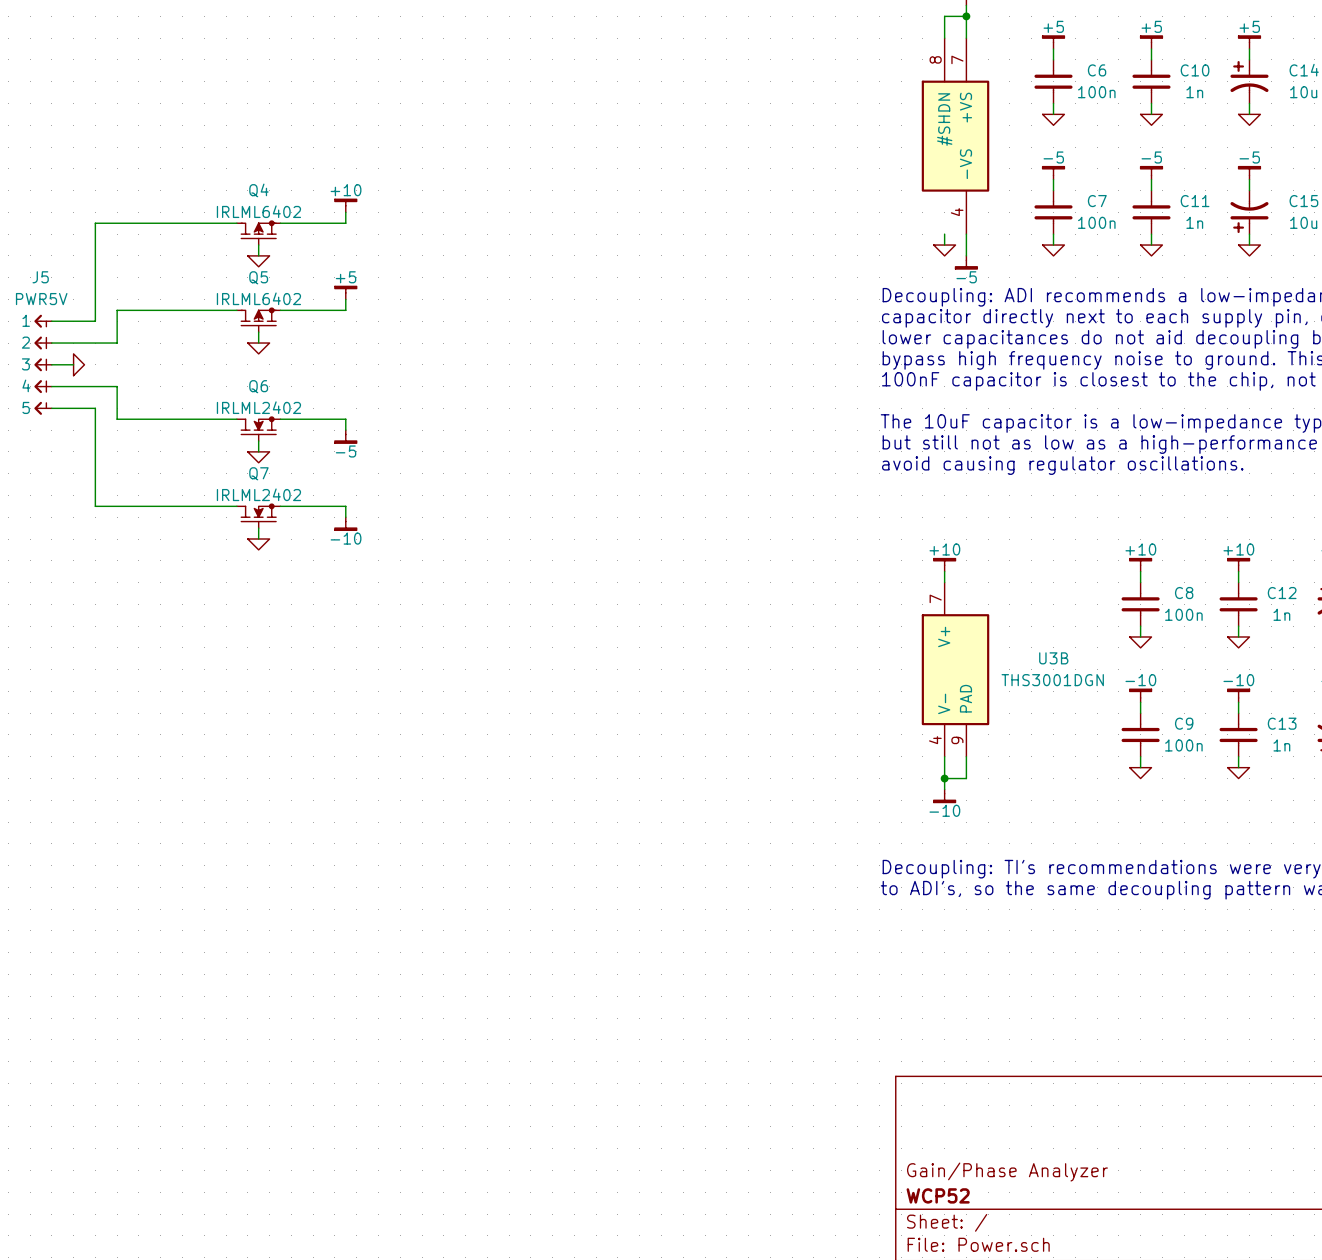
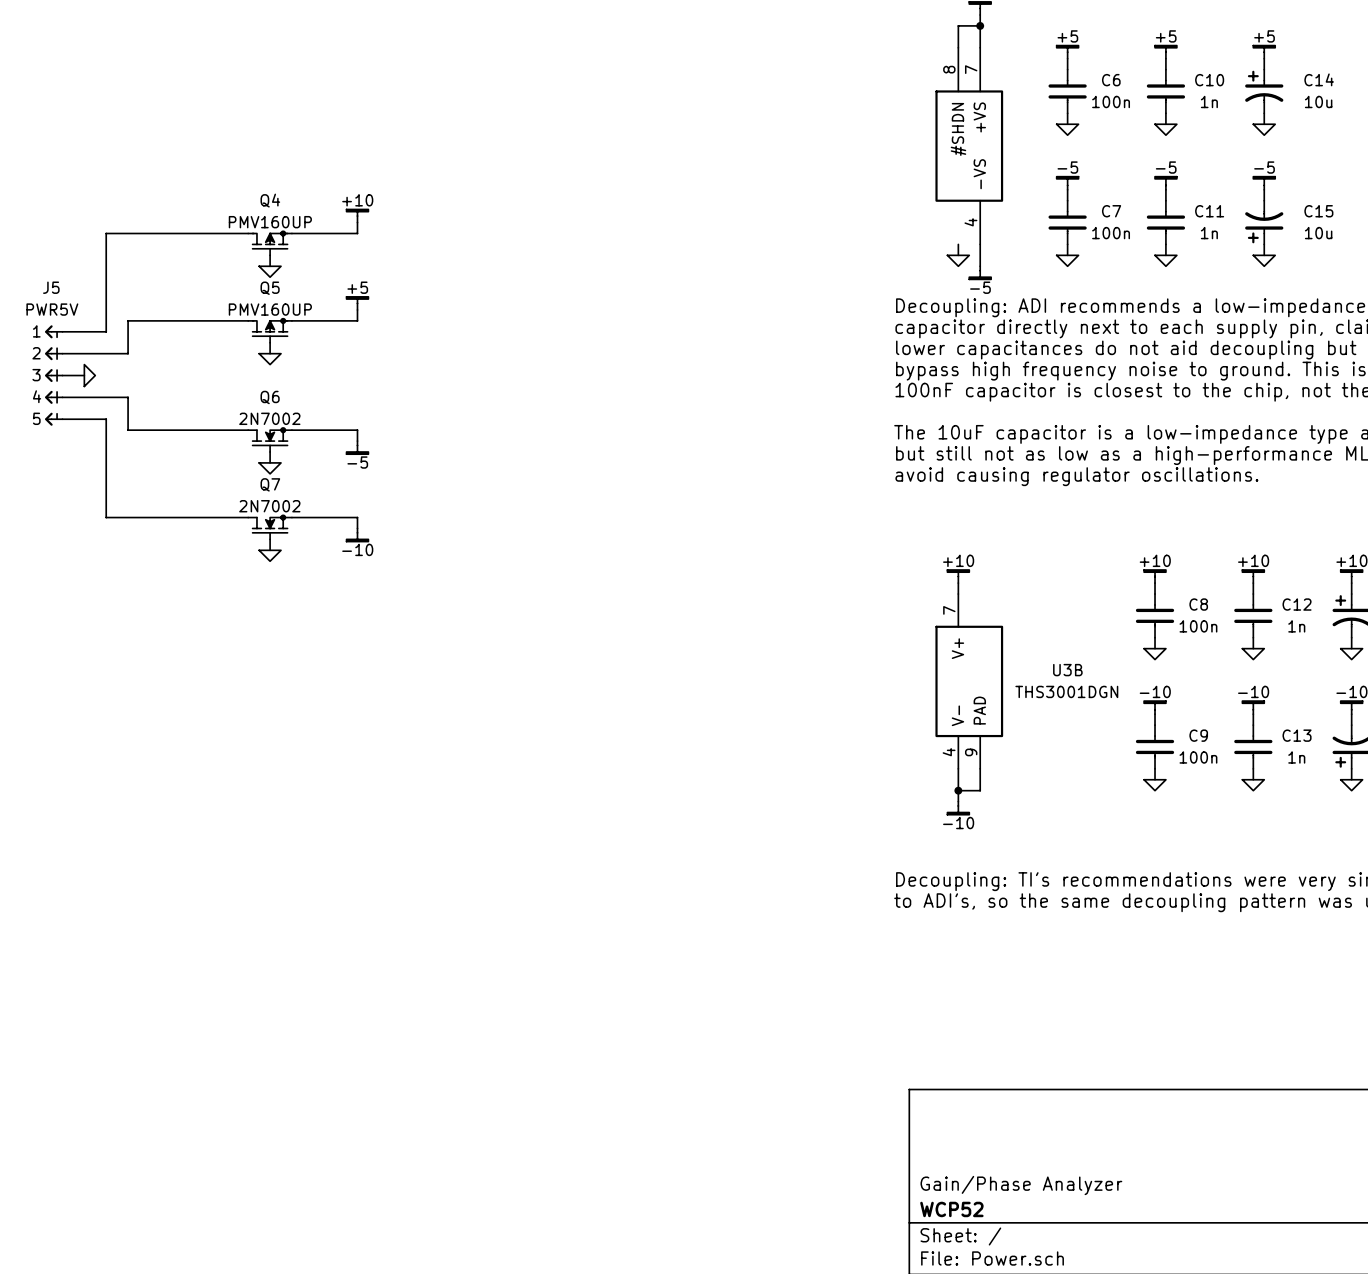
Q4 value: IRLML6402 (258, 211) -> PMV160UP (270, 222)
Q5 value: IRLML6402 (258, 298) -> PMV160UP (270, 309)
Q6 value: IRLML2402 (258, 407) -> 2N7002 (269, 418)
Q7 value: IRLML2402 (258, 494) -> 2N7002 (269, 506)

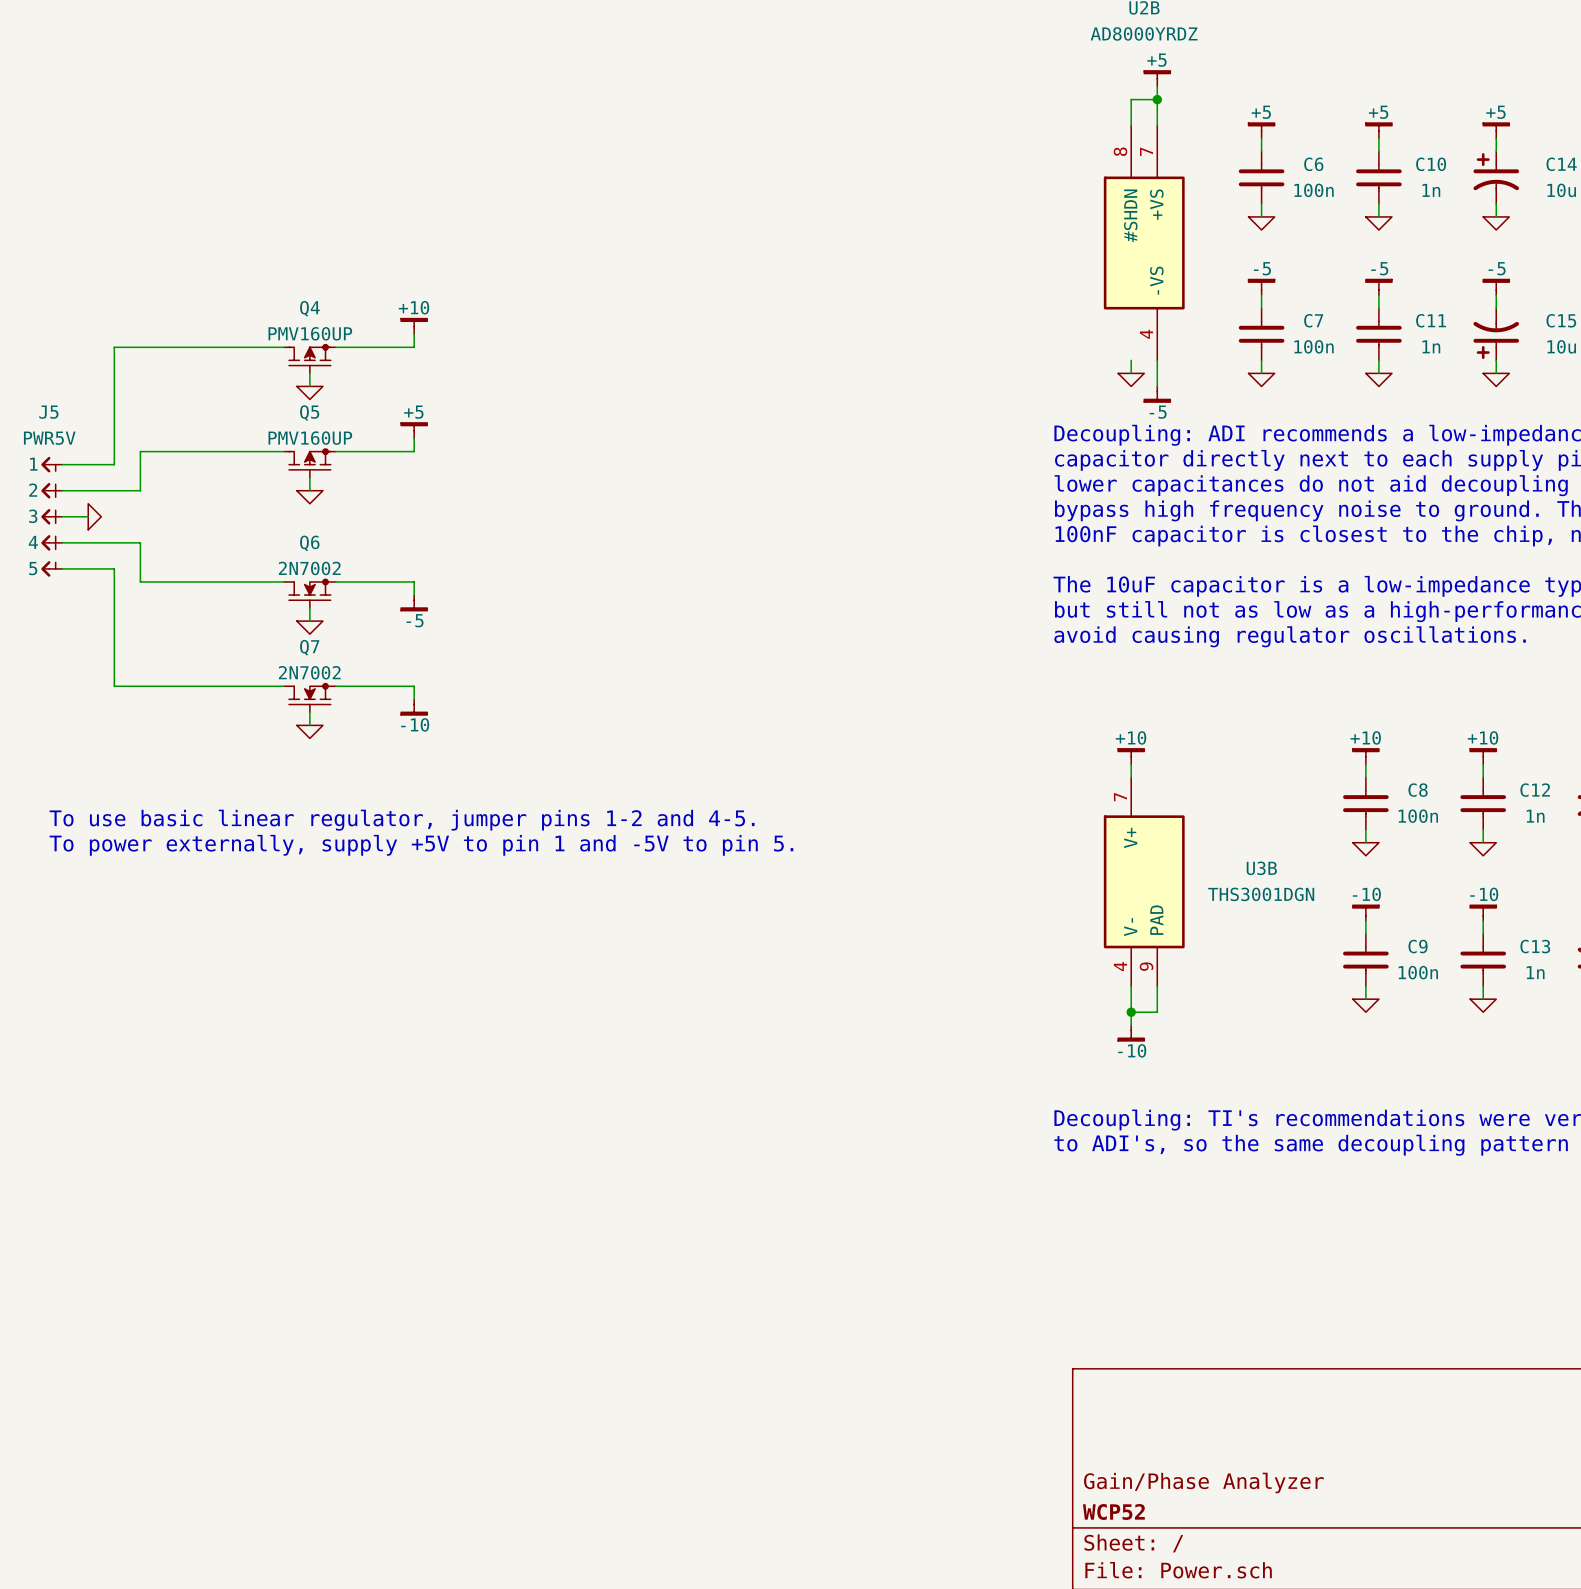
text: none -> To use basic linear regulator, jumper pins 1-2 and 4-5. (402, 820)
text: none -> To power externally, supply +5V to pin 1 and -5V to pin 5. (421, 845)

